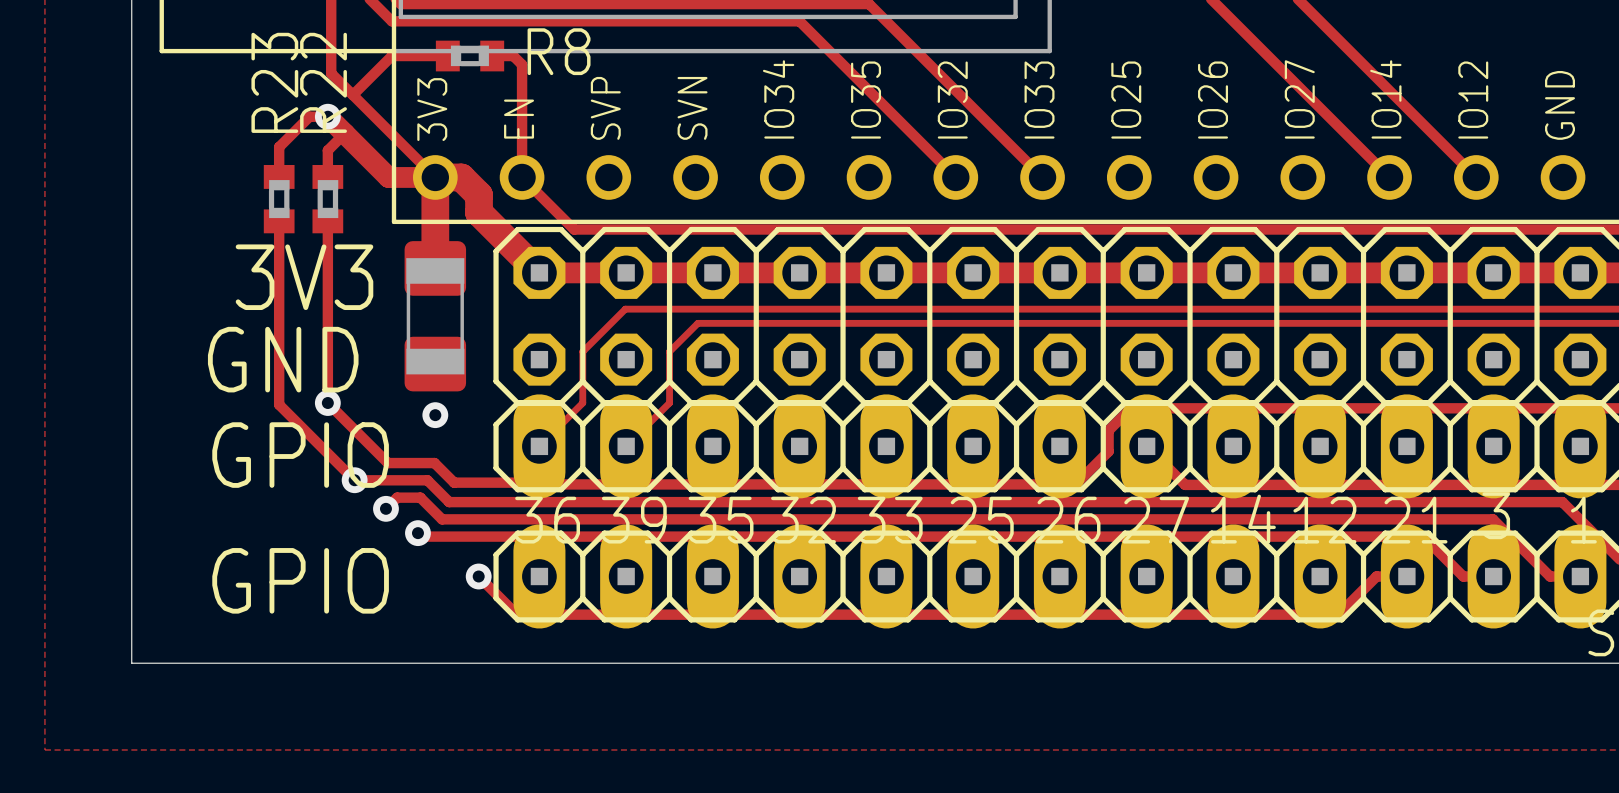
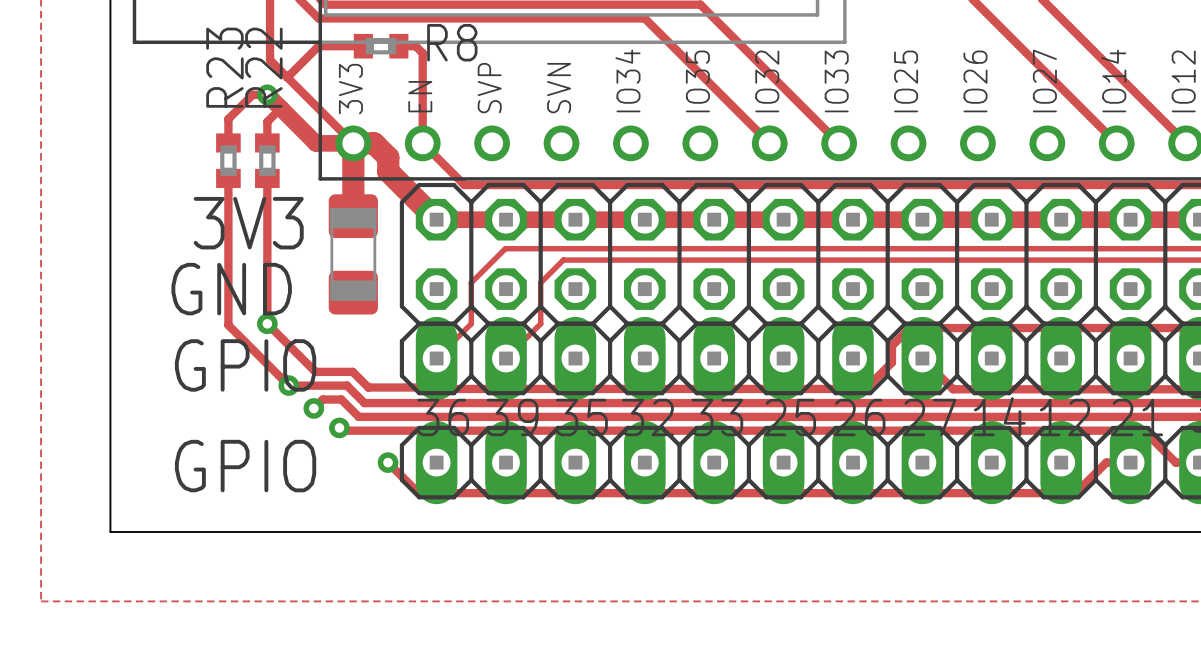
via: (435, 415) -> none

